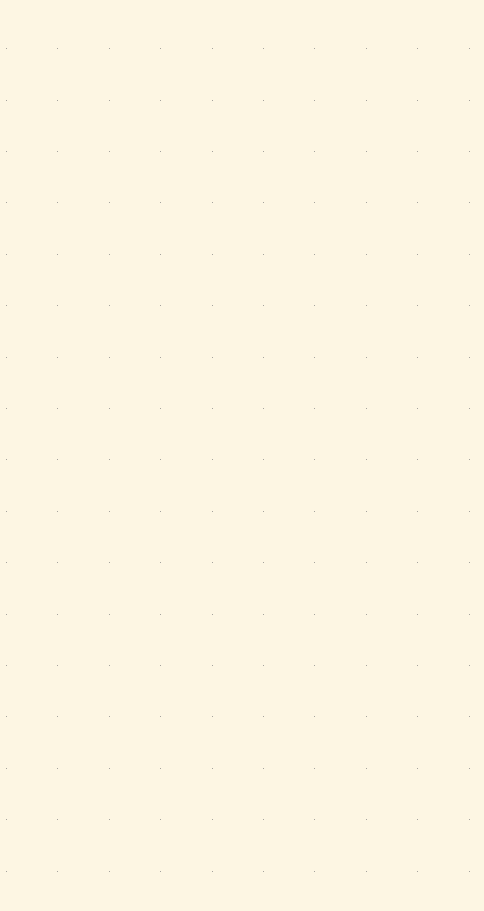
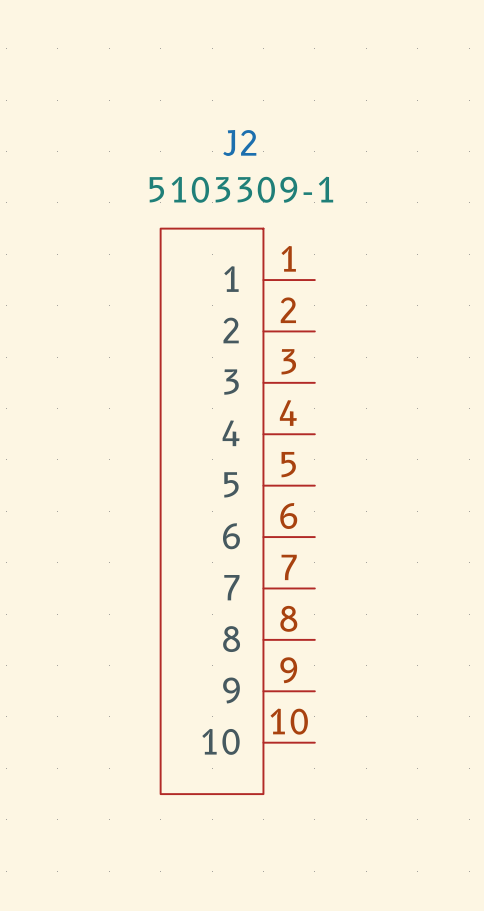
J2: none -> 5103309-1 (237, 511)

